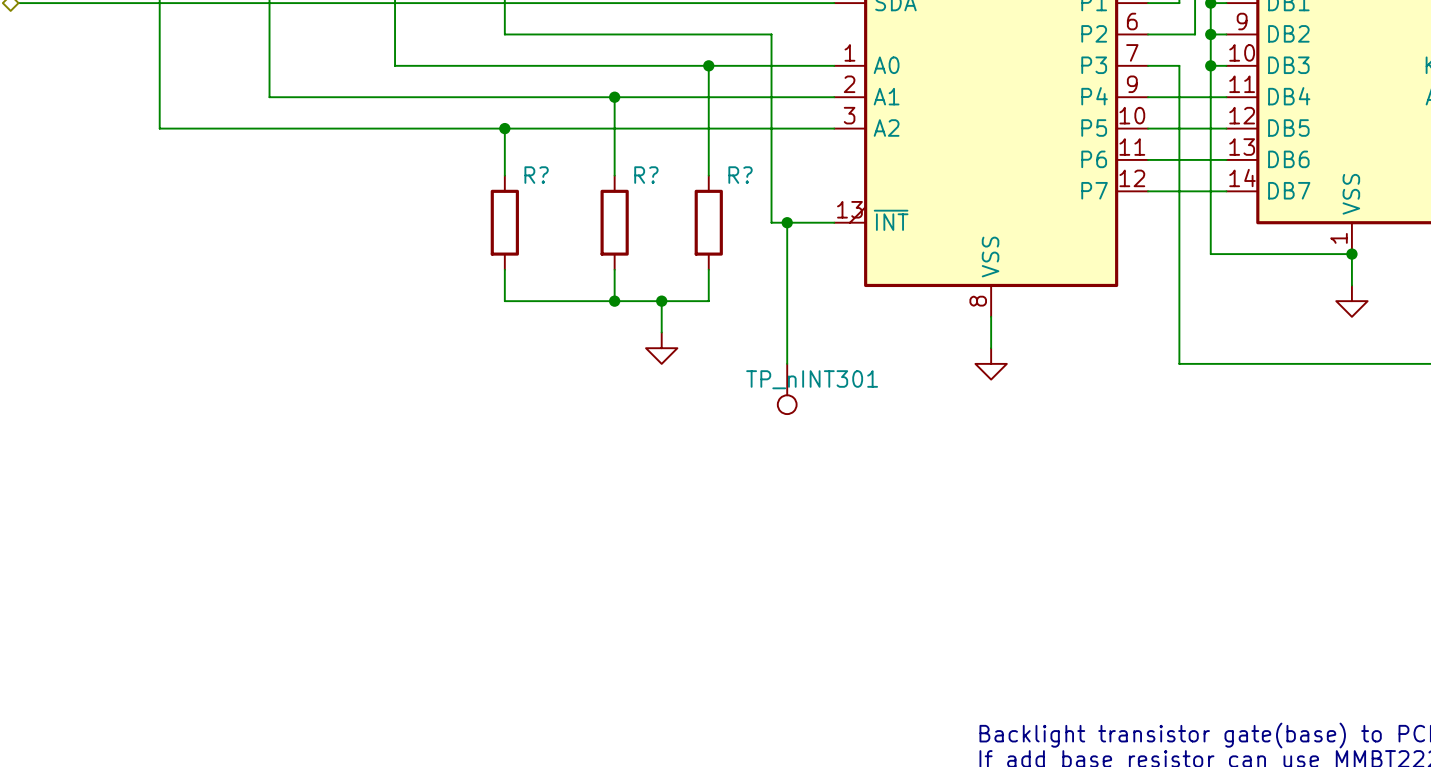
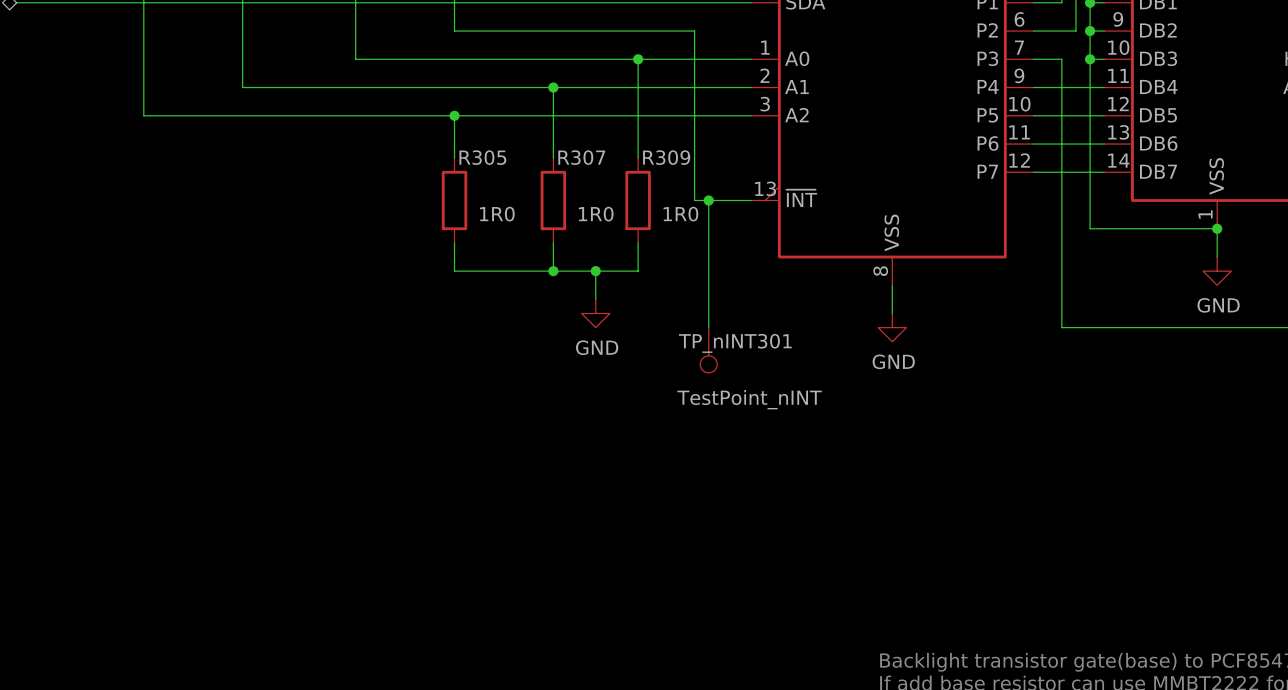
R? name: R? (536, 175) -> R305 (482, 157)
R? name: R? (646, 175) -> R307 (581, 157)
R? name: R? (740, 175) -> R309 (666, 157)
R? value: none -> 1R0 (497, 214)
R? value: none -> 1R0 (596, 214)
R? value: none -> 1R0 (680, 214)
power symbol text: none -> GND (1218, 305)
power symbol text: none -> GND (597, 347)
power symbol text: none -> GND (893, 361)
TP_nINT301 value: none -> TestPoint_nINT (749, 399)

